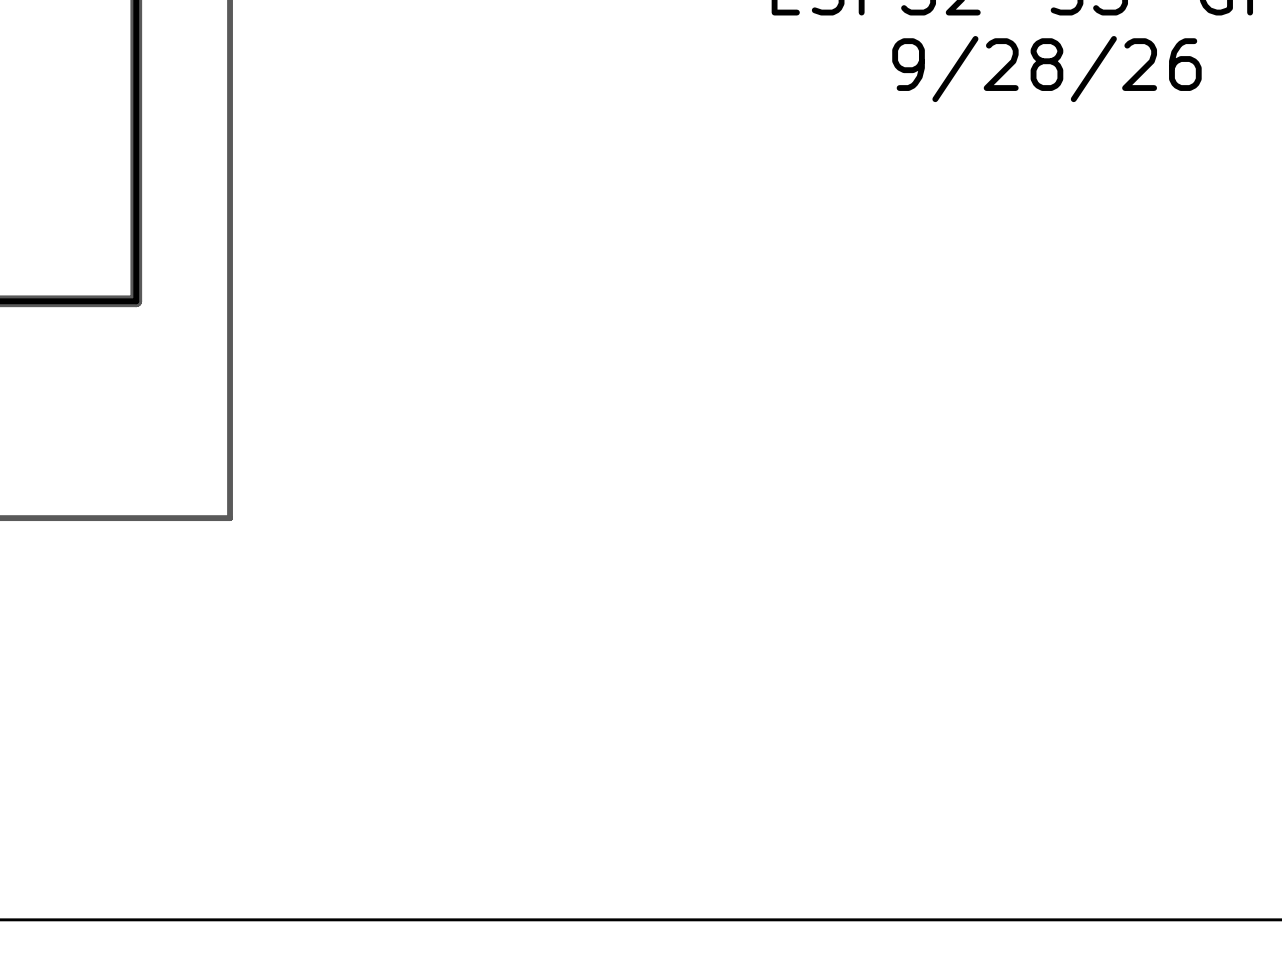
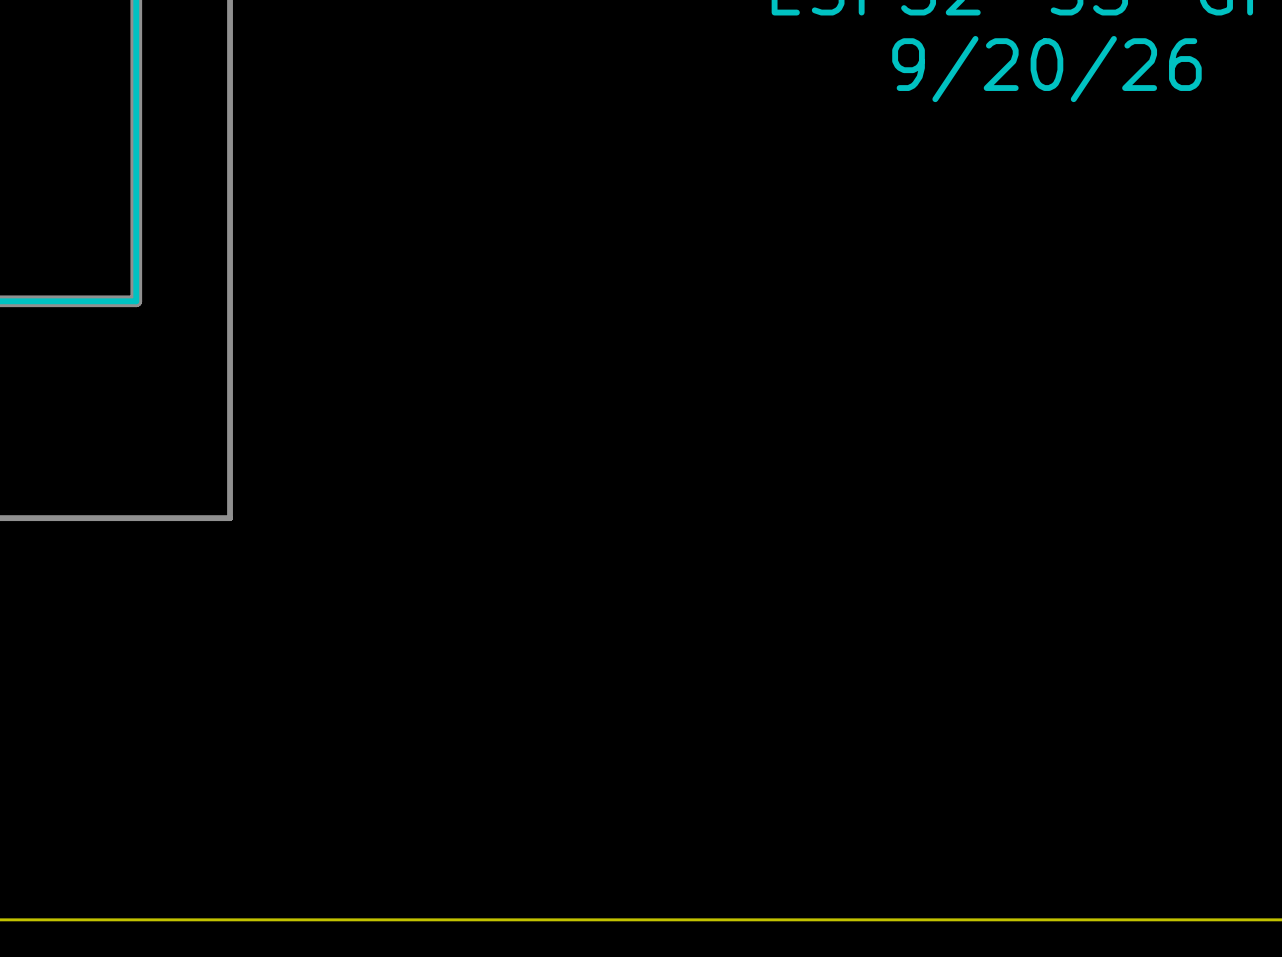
text: 9/28/26 (1046, 69) -> 9/20/26 (1046, 69)

